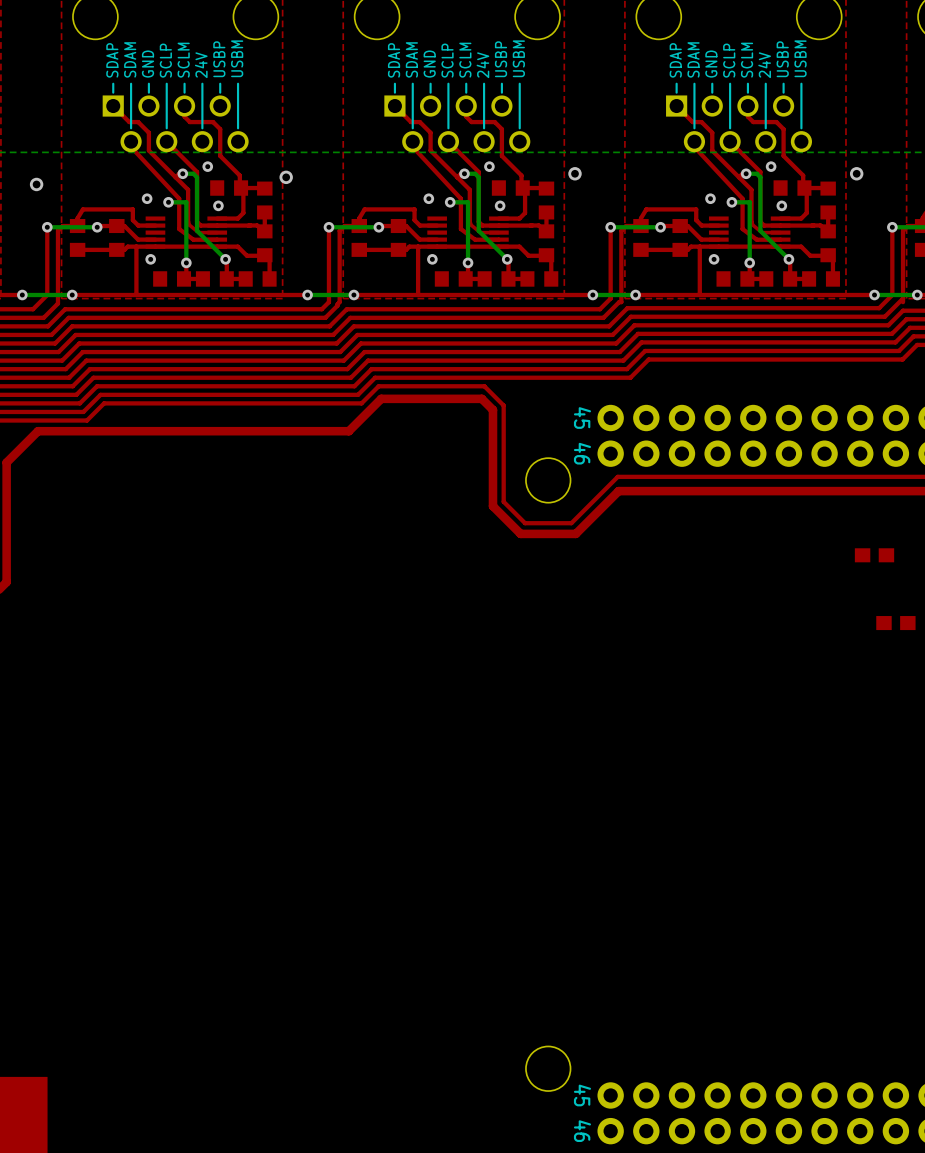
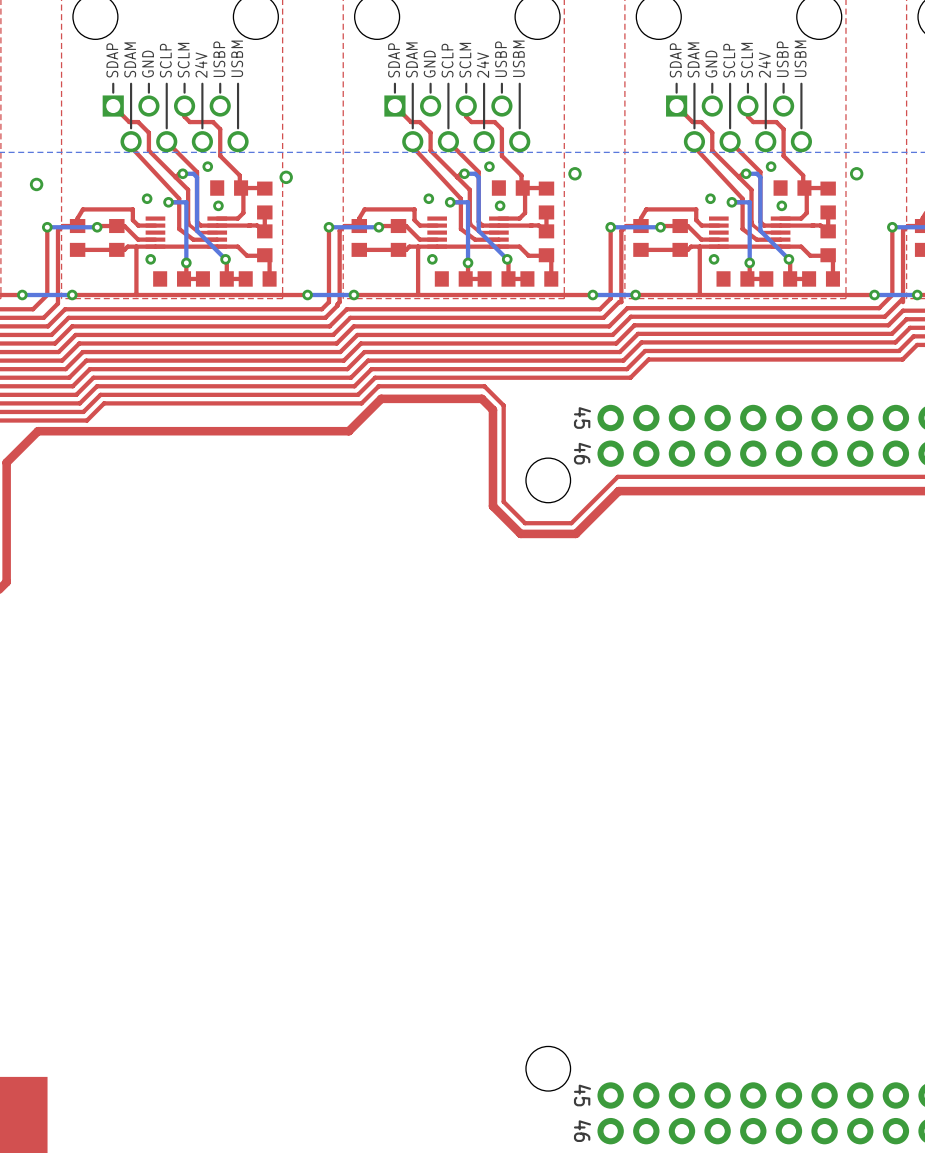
part: (874, 555) -> none
part: (895, 623) -> none

